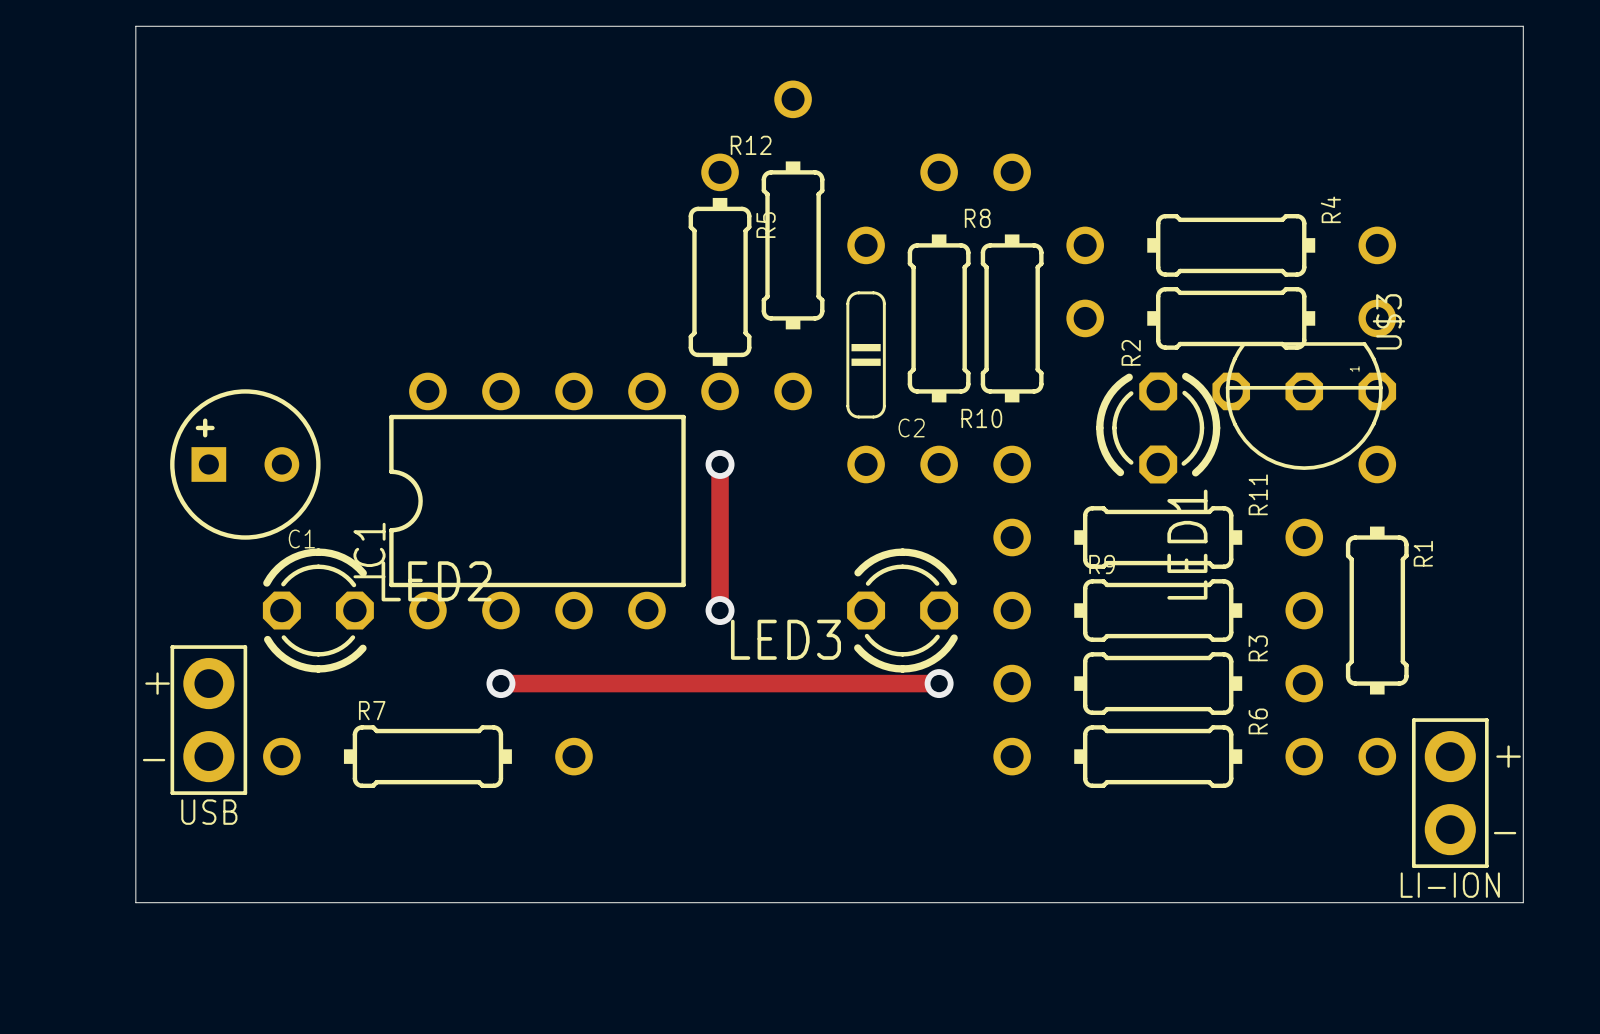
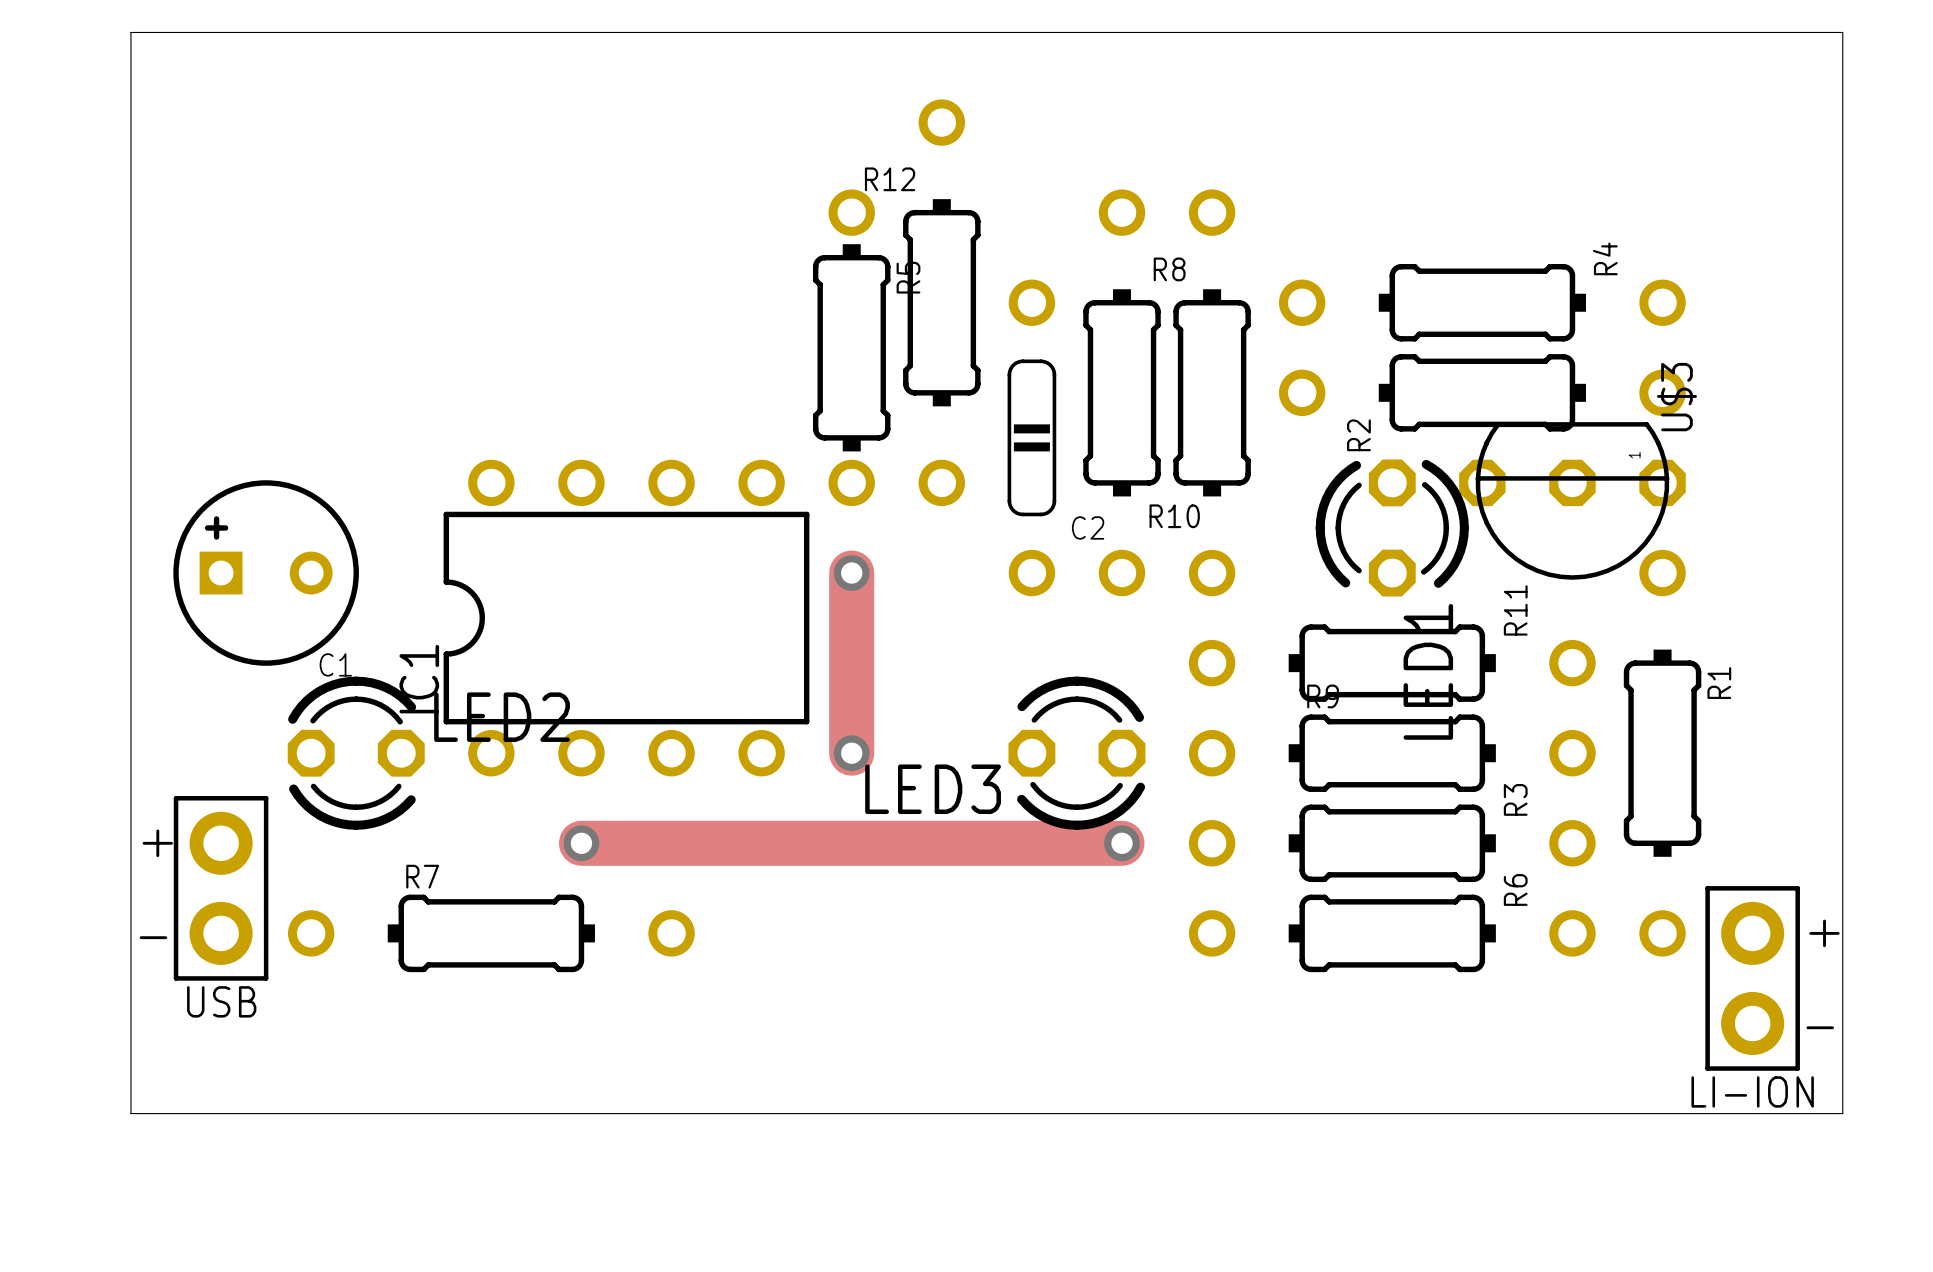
track width: thin (720, 464) (720, 610) -> thick (851, 573) (851, 753)
track width: thin (500, 683) (939, 683) -> thick (581, 843) (1122, 843)

